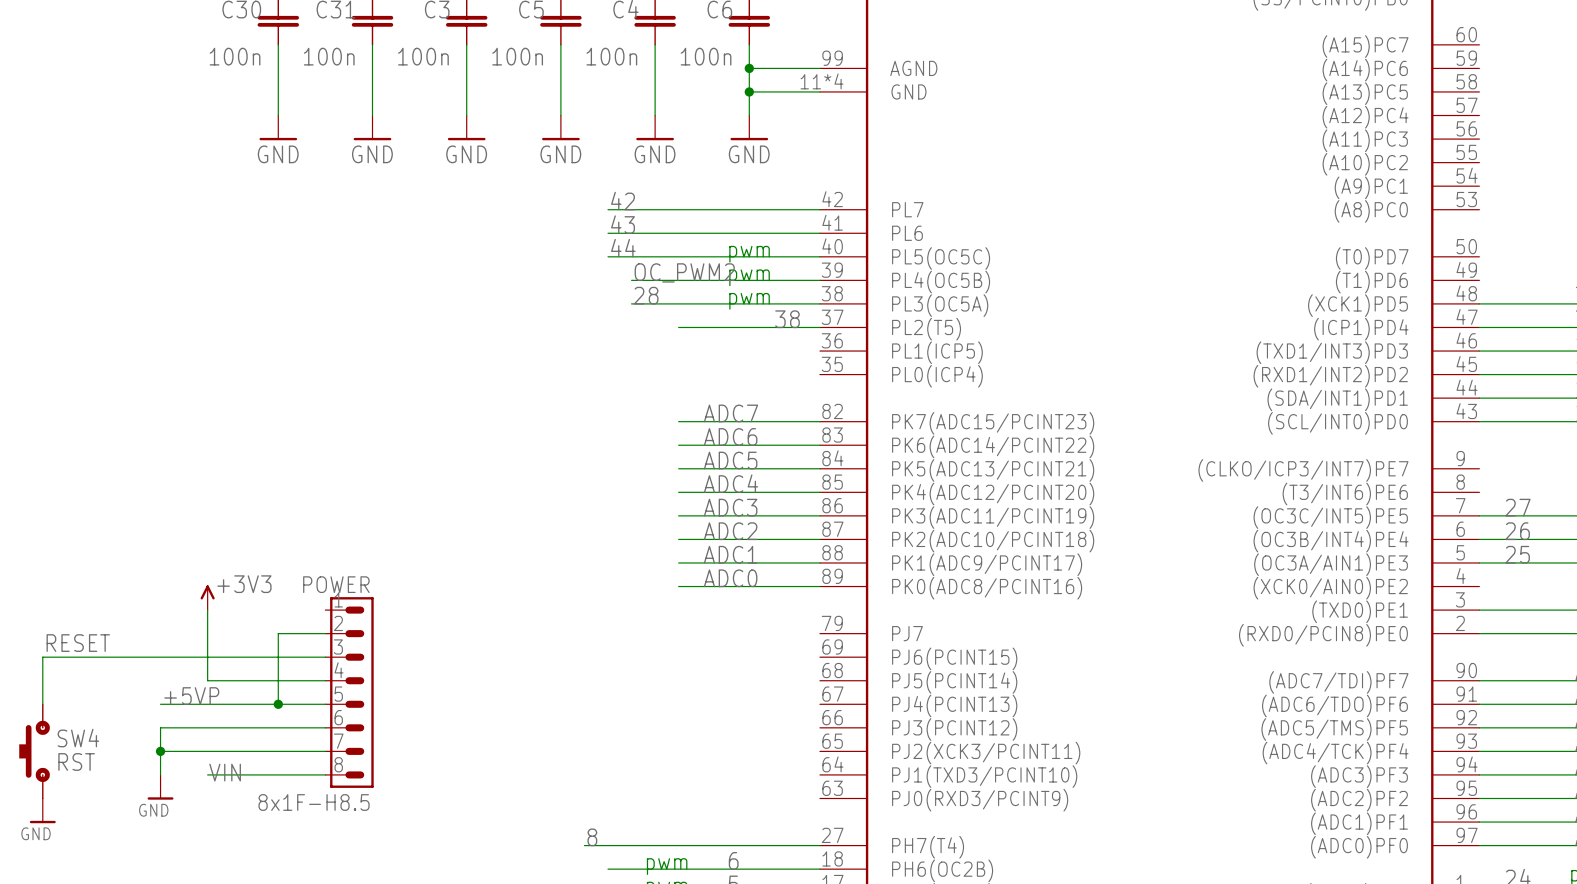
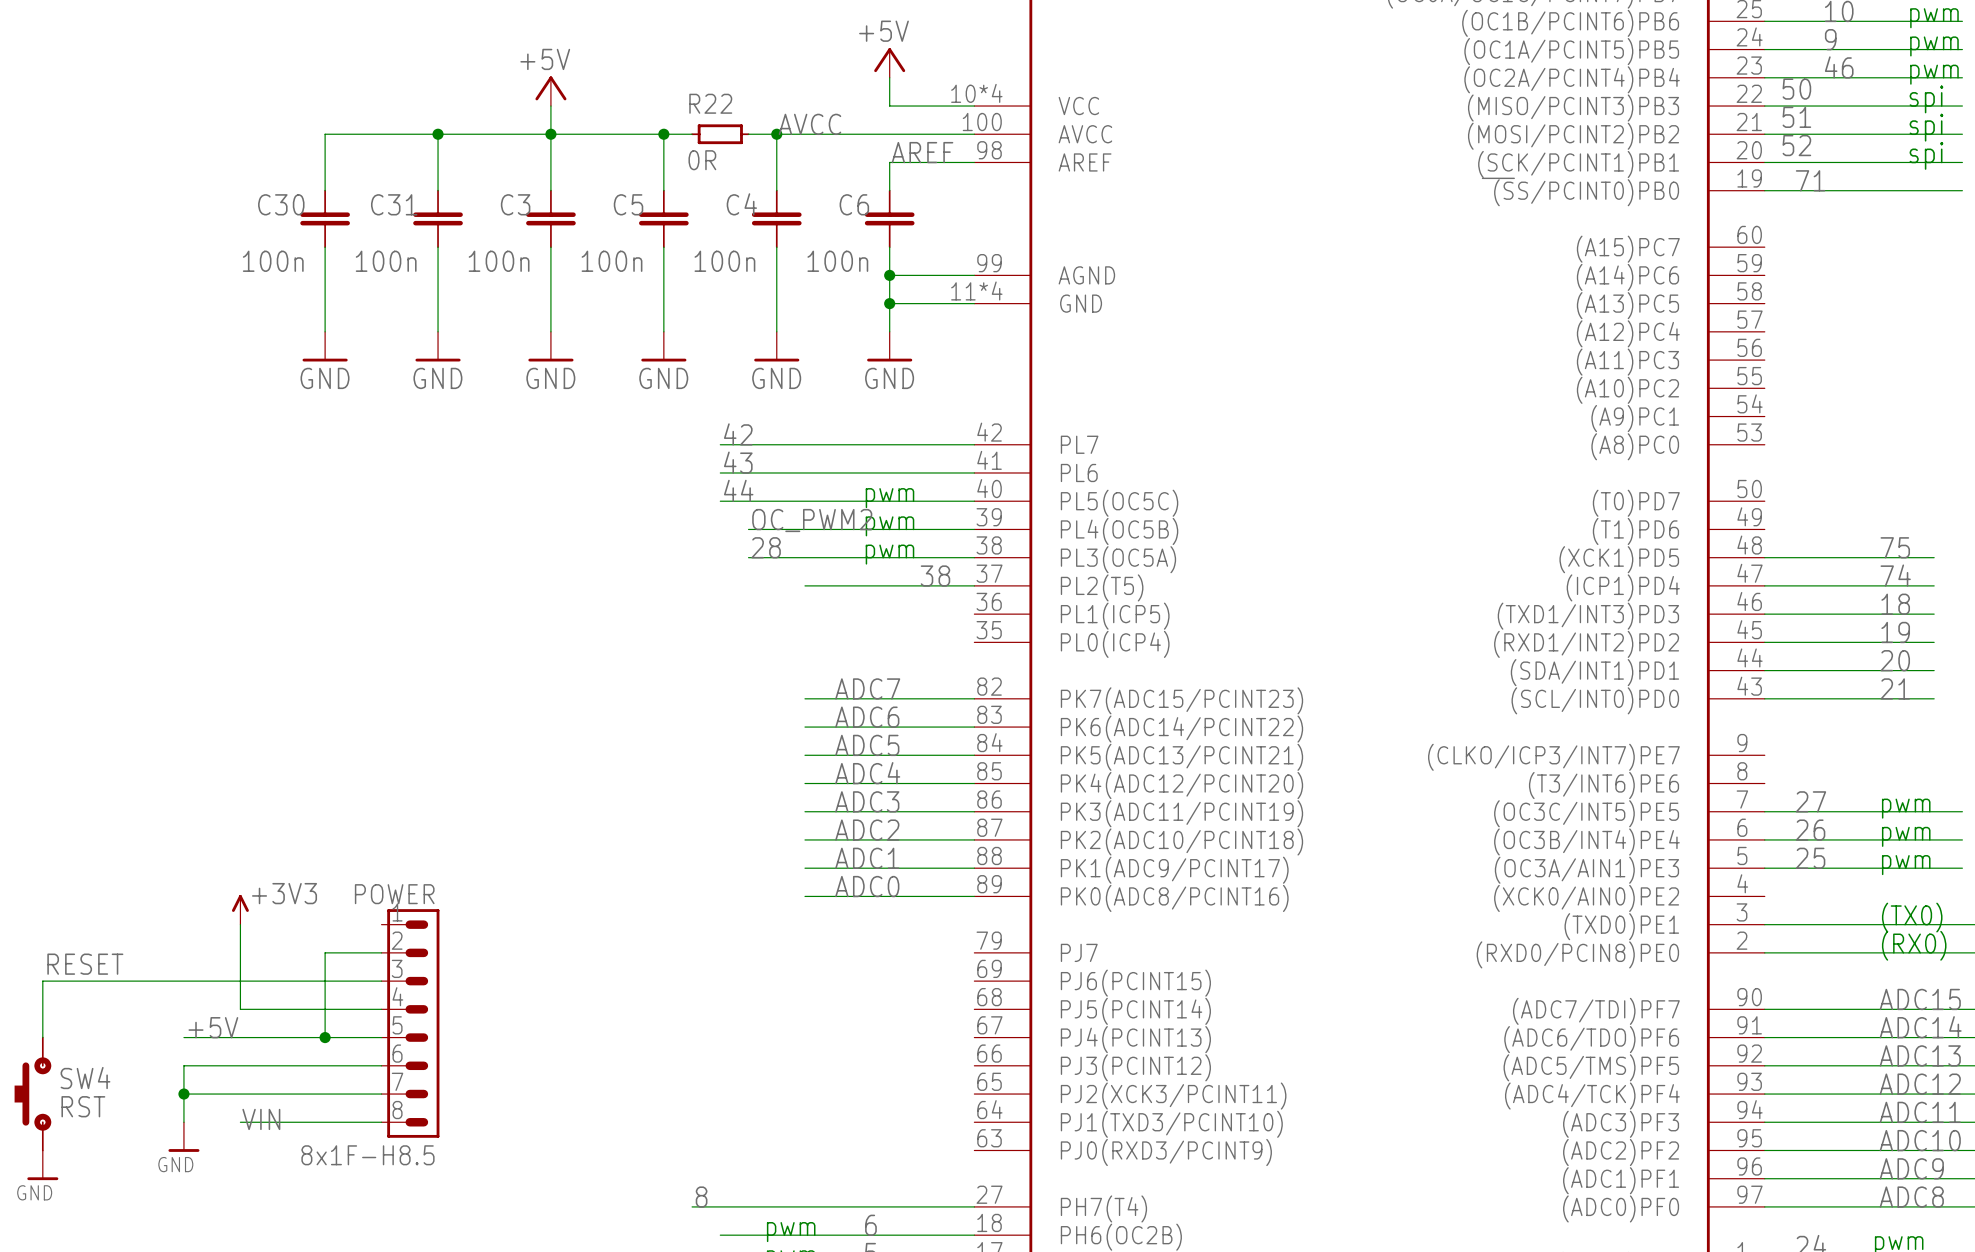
label: +5VP (191, 696) -> +5V (213, 1027)

